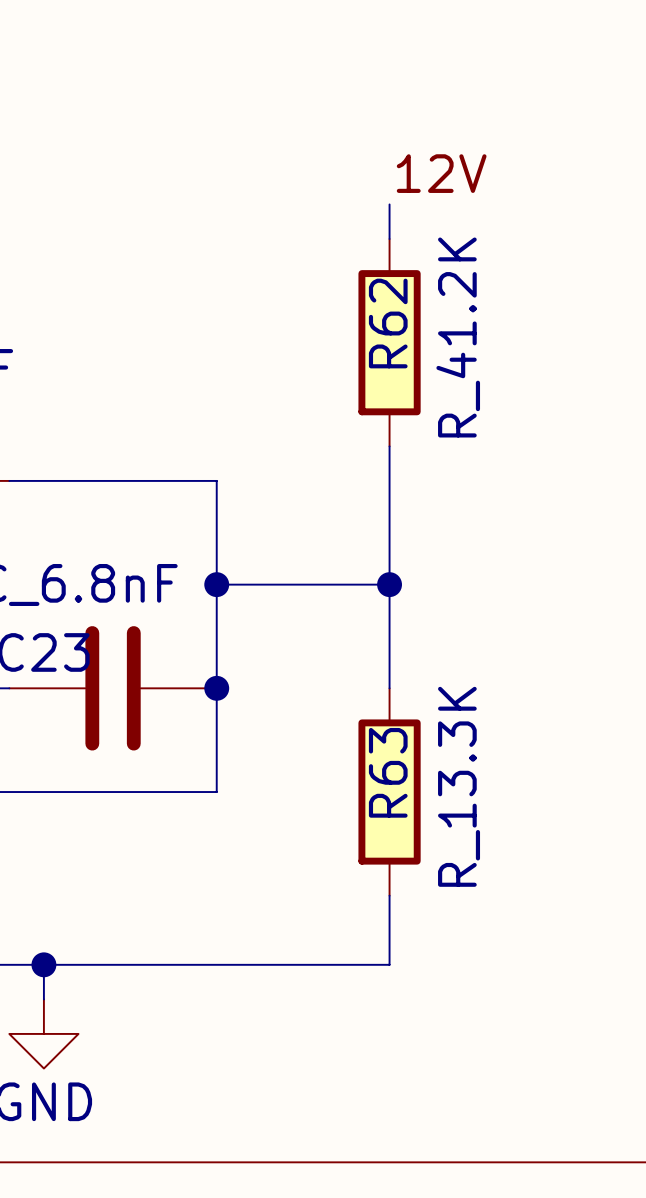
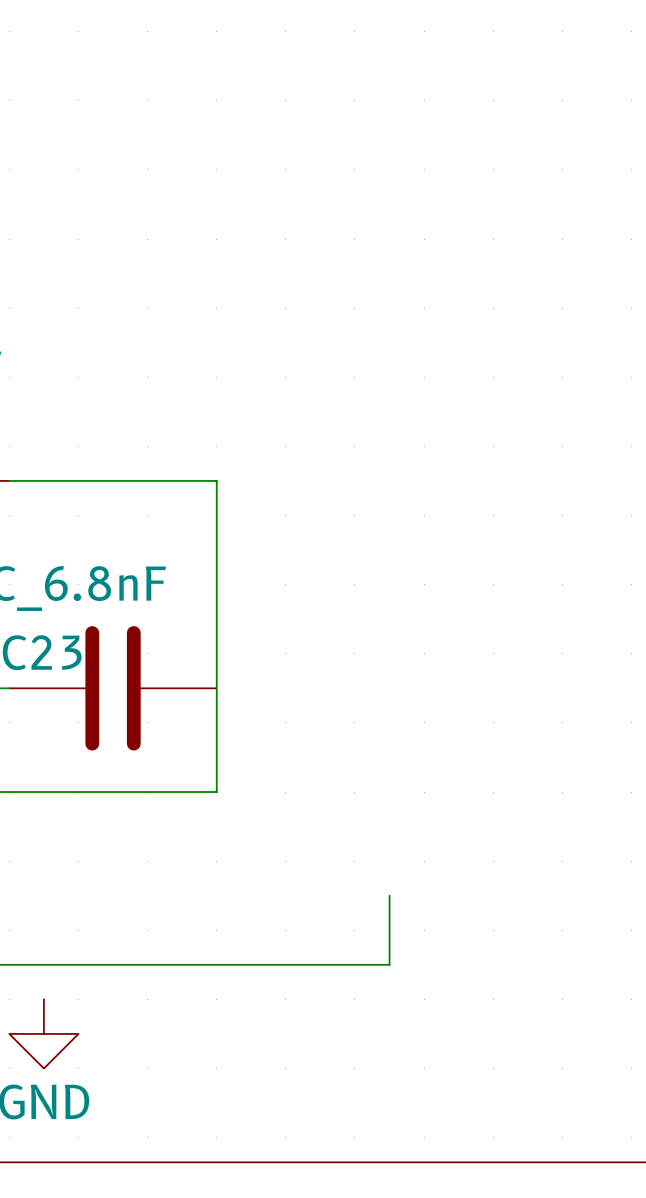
label: 12V (441, 173) -> none
wire: (389, 204) (389, 239) -> none
R62: R_41.2K (389, 342) -> none
wire: (389, 446) (389, 688) -> none
wire: (216, 584) (389, 584) -> none
junction: (216, 584) -> none
junction: (389, 584) -> none
junction: (216, 688) -> none
R63: R_13.3K (389, 792) -> none
wire: (43, 964) (43, 999) -> none
junction: (43, 964) -> none

